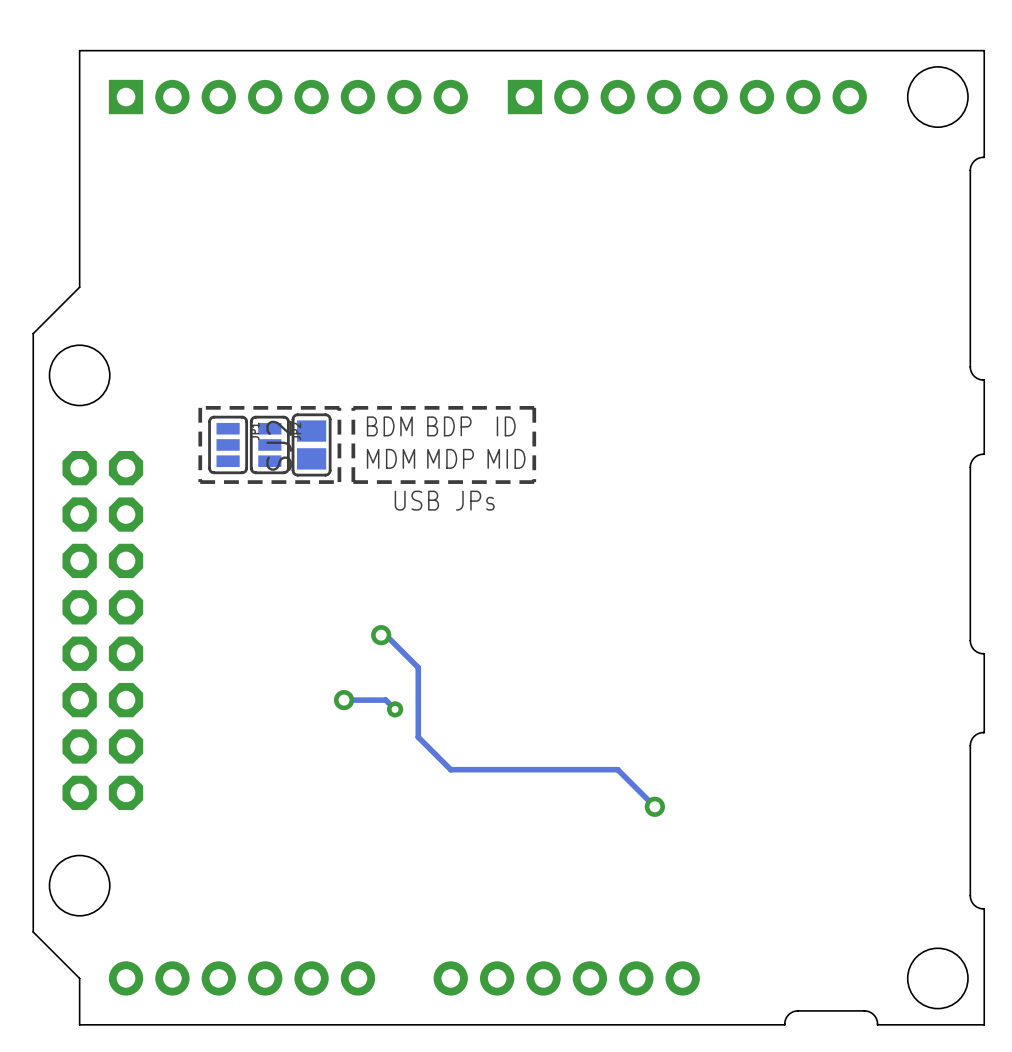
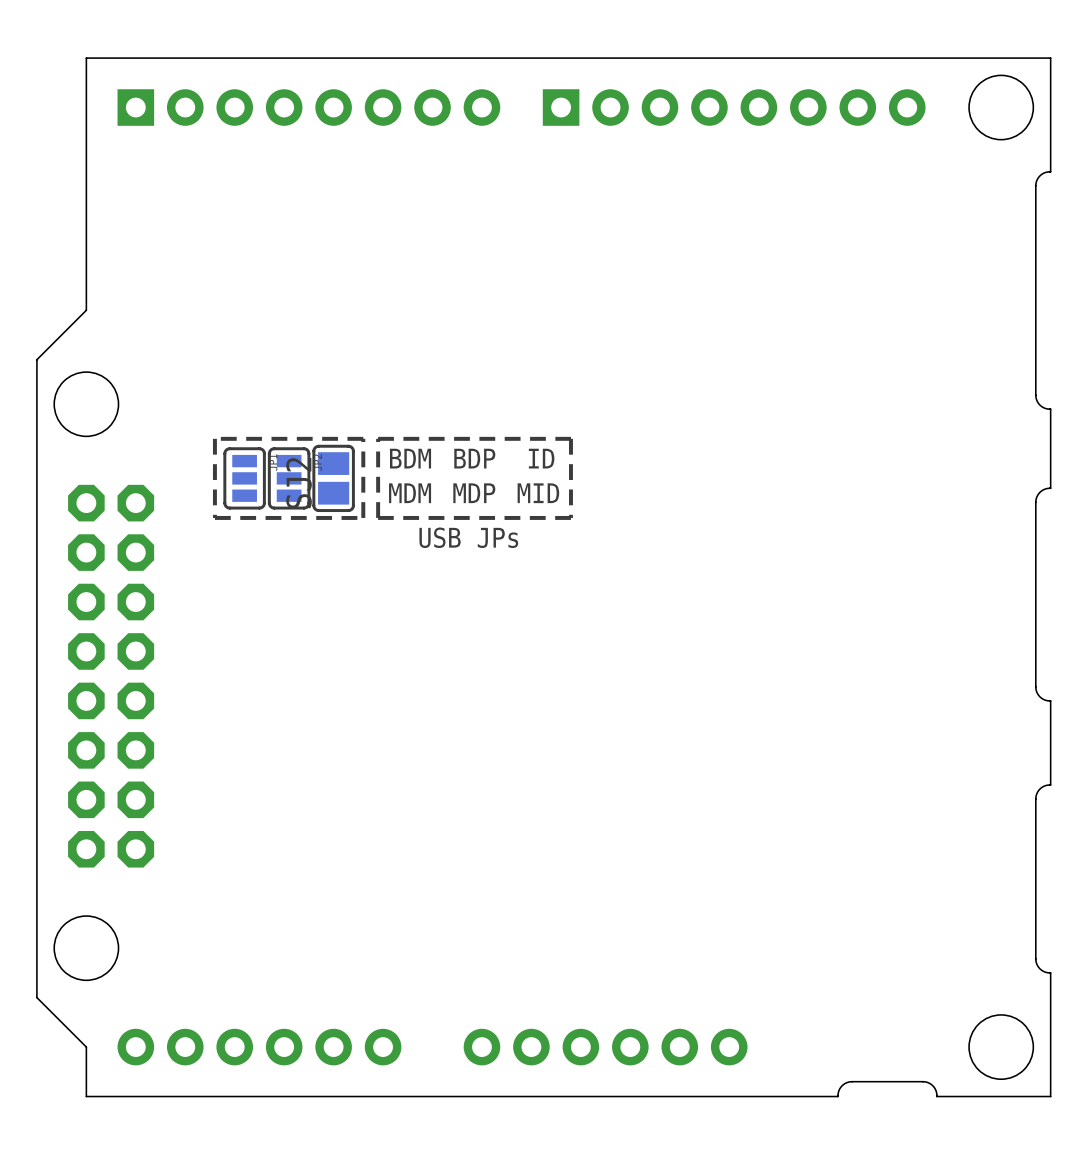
track: (381, 635) (385, 635) (418, 667) (418, 737) (450, 769) (617, 769) (654, 806) -> none
via: (381, 635) -> none
track: (344, 700) (385, 700) (395, 709) -> none
via: (344, 700) -> none
via: (395, 709) -> none
via: (654, 806) -> none

